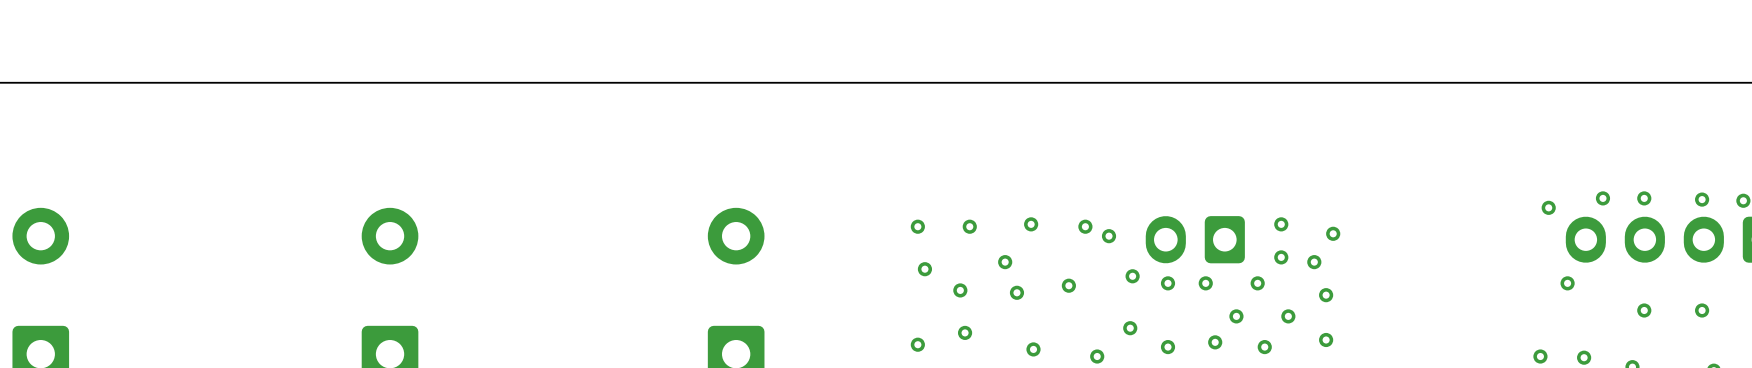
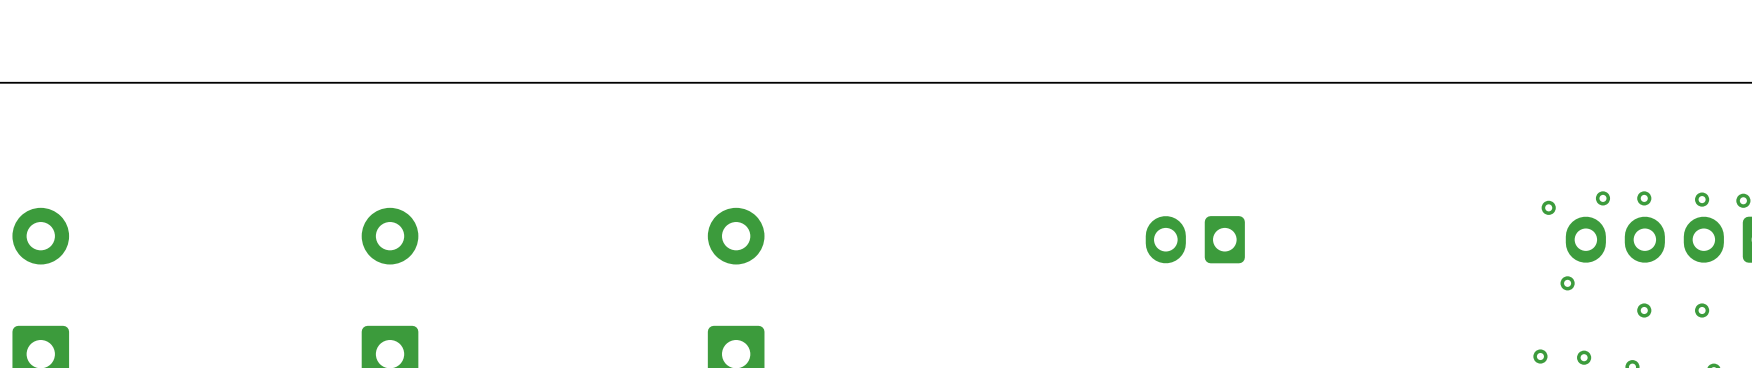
via: (1031, 224) -> none
via: (1281, 224) -> none
via: (917, 226) -> none
via: (969, 226) -> none
via: (1085, 226) -> none
via: (1333, 233) -> none
via: (1109, 236) -> none
via: (1281, 257) -> none
via: (1005, 262) -> none
via: (1314, 262) -> none
via: (924, 269) -> none
via: (1132, 276) -> none
via: (1168, 283) -> none
via: (1205, 283) -> none
via: (1257, 283) -> none
via: (1068, 285) -> none
via: (960, 290) -> none
via: (1016, 292) -> none
via: (1326, 295) -> none
via: (1236, 316) -> none
via: (1288, 316) -> none
via: (1130, 328) -> none
via: (965, 332) -> none
via: (1326, 339) -> none
via: (1215, 342) -> none
via: (917, 344) -> none
via: (1168, 347) -> none
via: (1264, 347) -> none
via: (1033, 349) -> none
via: (1097, 356) -> none

